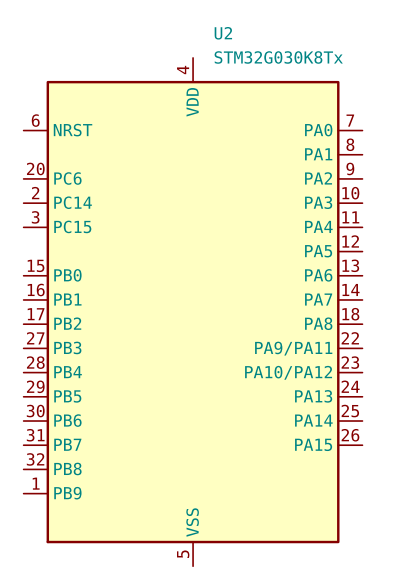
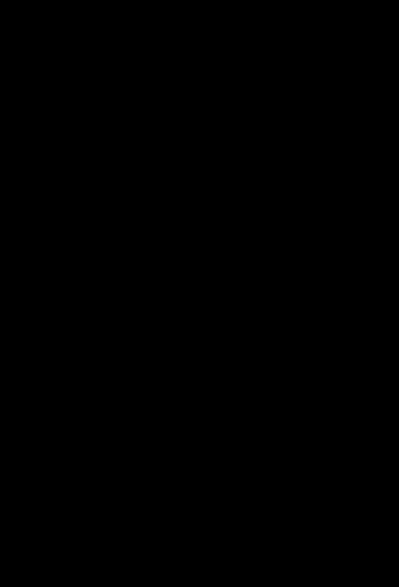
U2: STM32G030K8Tx (193, 312) -> none

